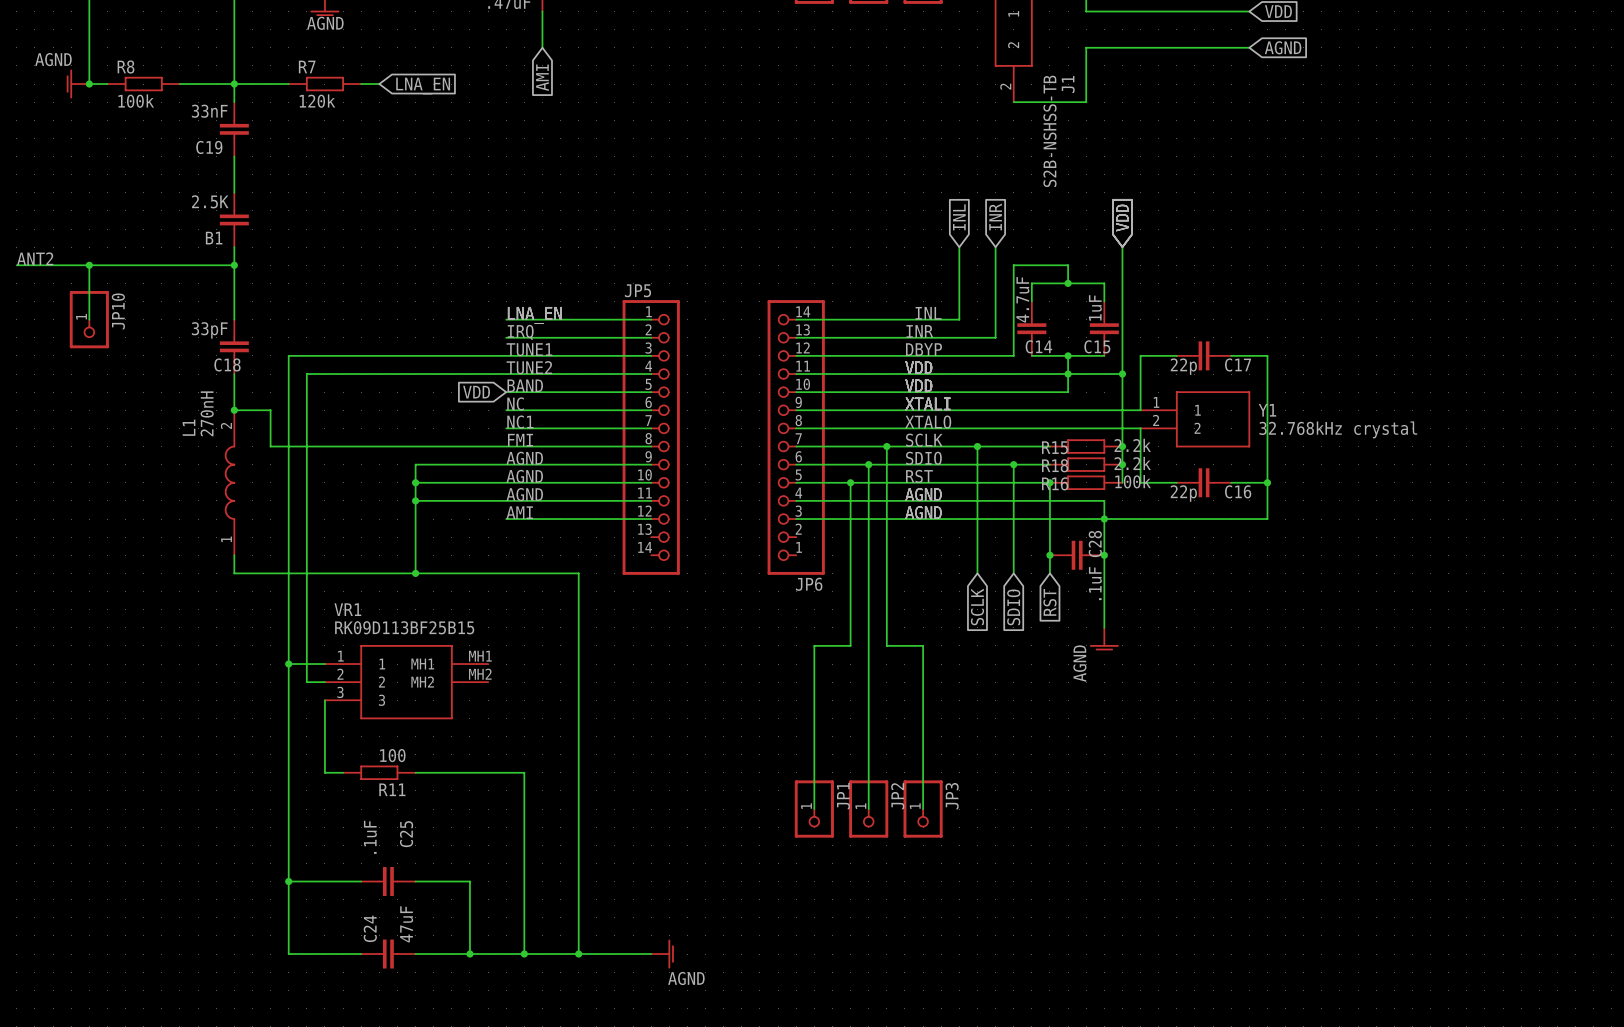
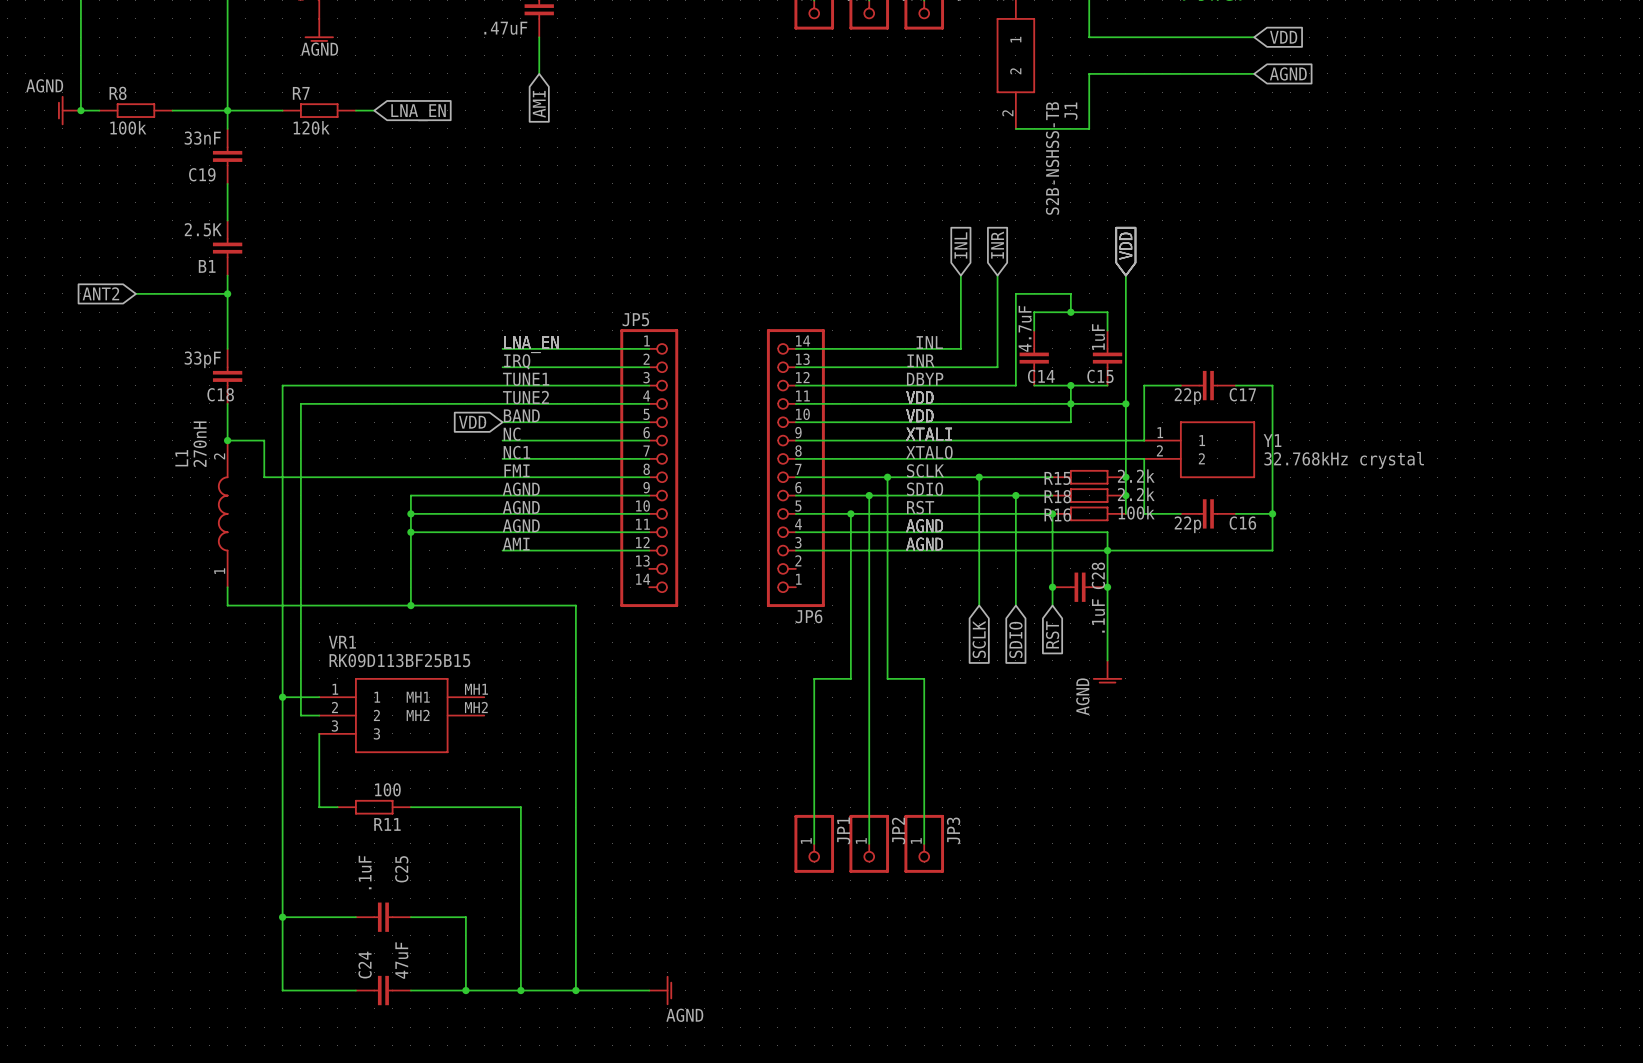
label: ANT2 (35, 258) -> none
wire: (16, 265) (143, 265) -> none
wire: (89, 265) (89, 319) -> none
junction: (89, 265) -> none
global label: none -> ANT2 (100, 293)
JP10: (89, 319) -> none

